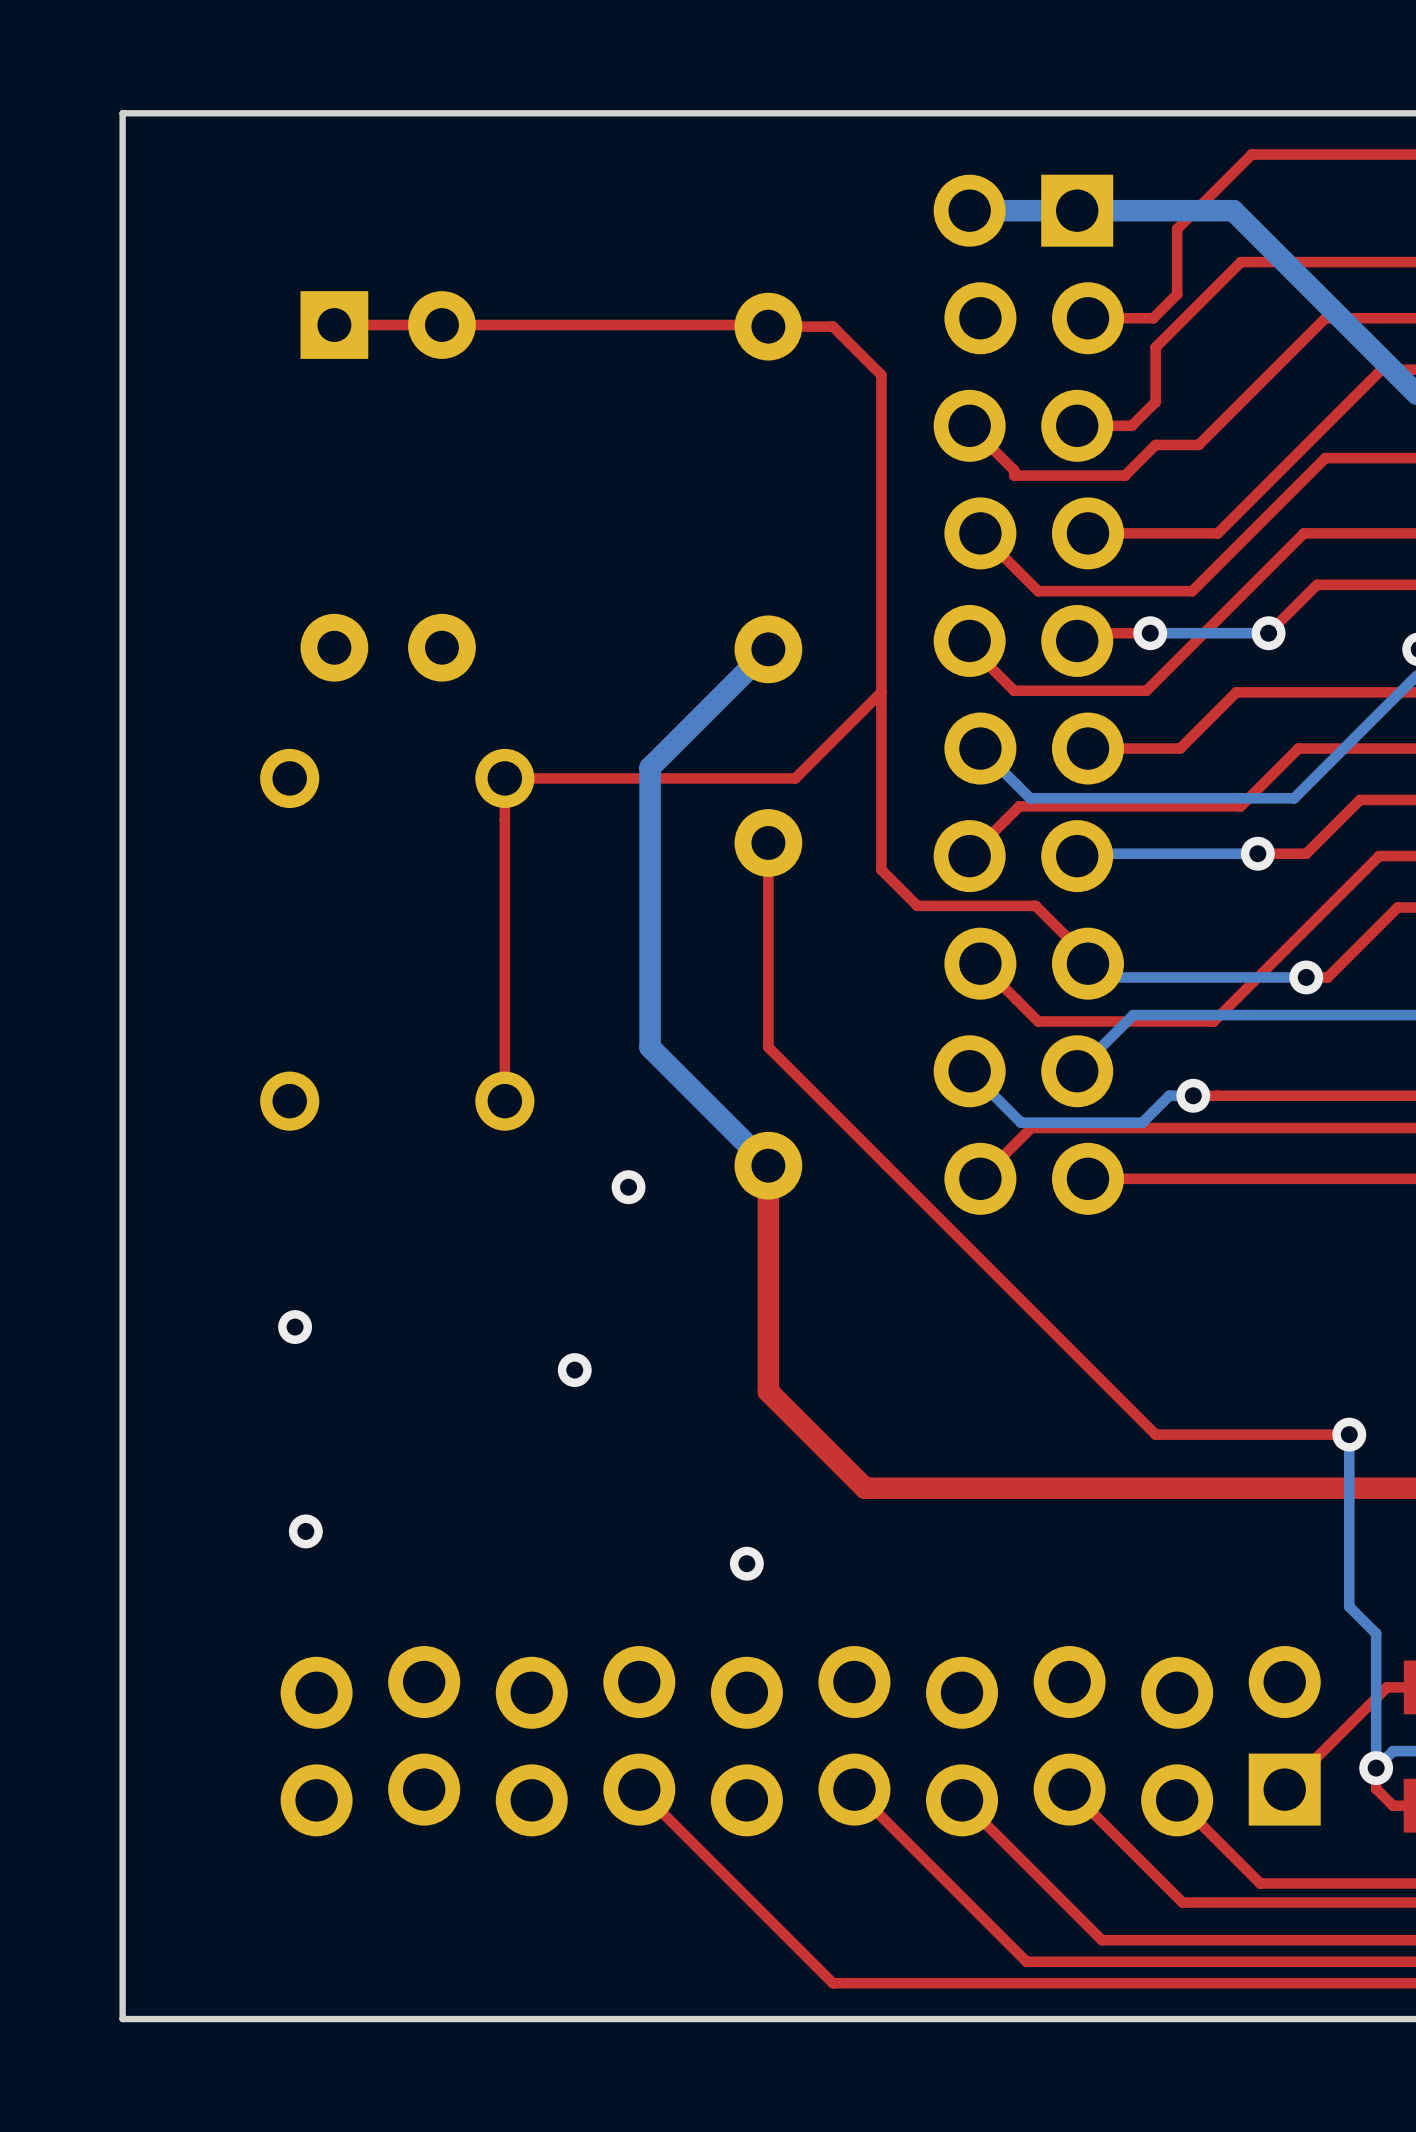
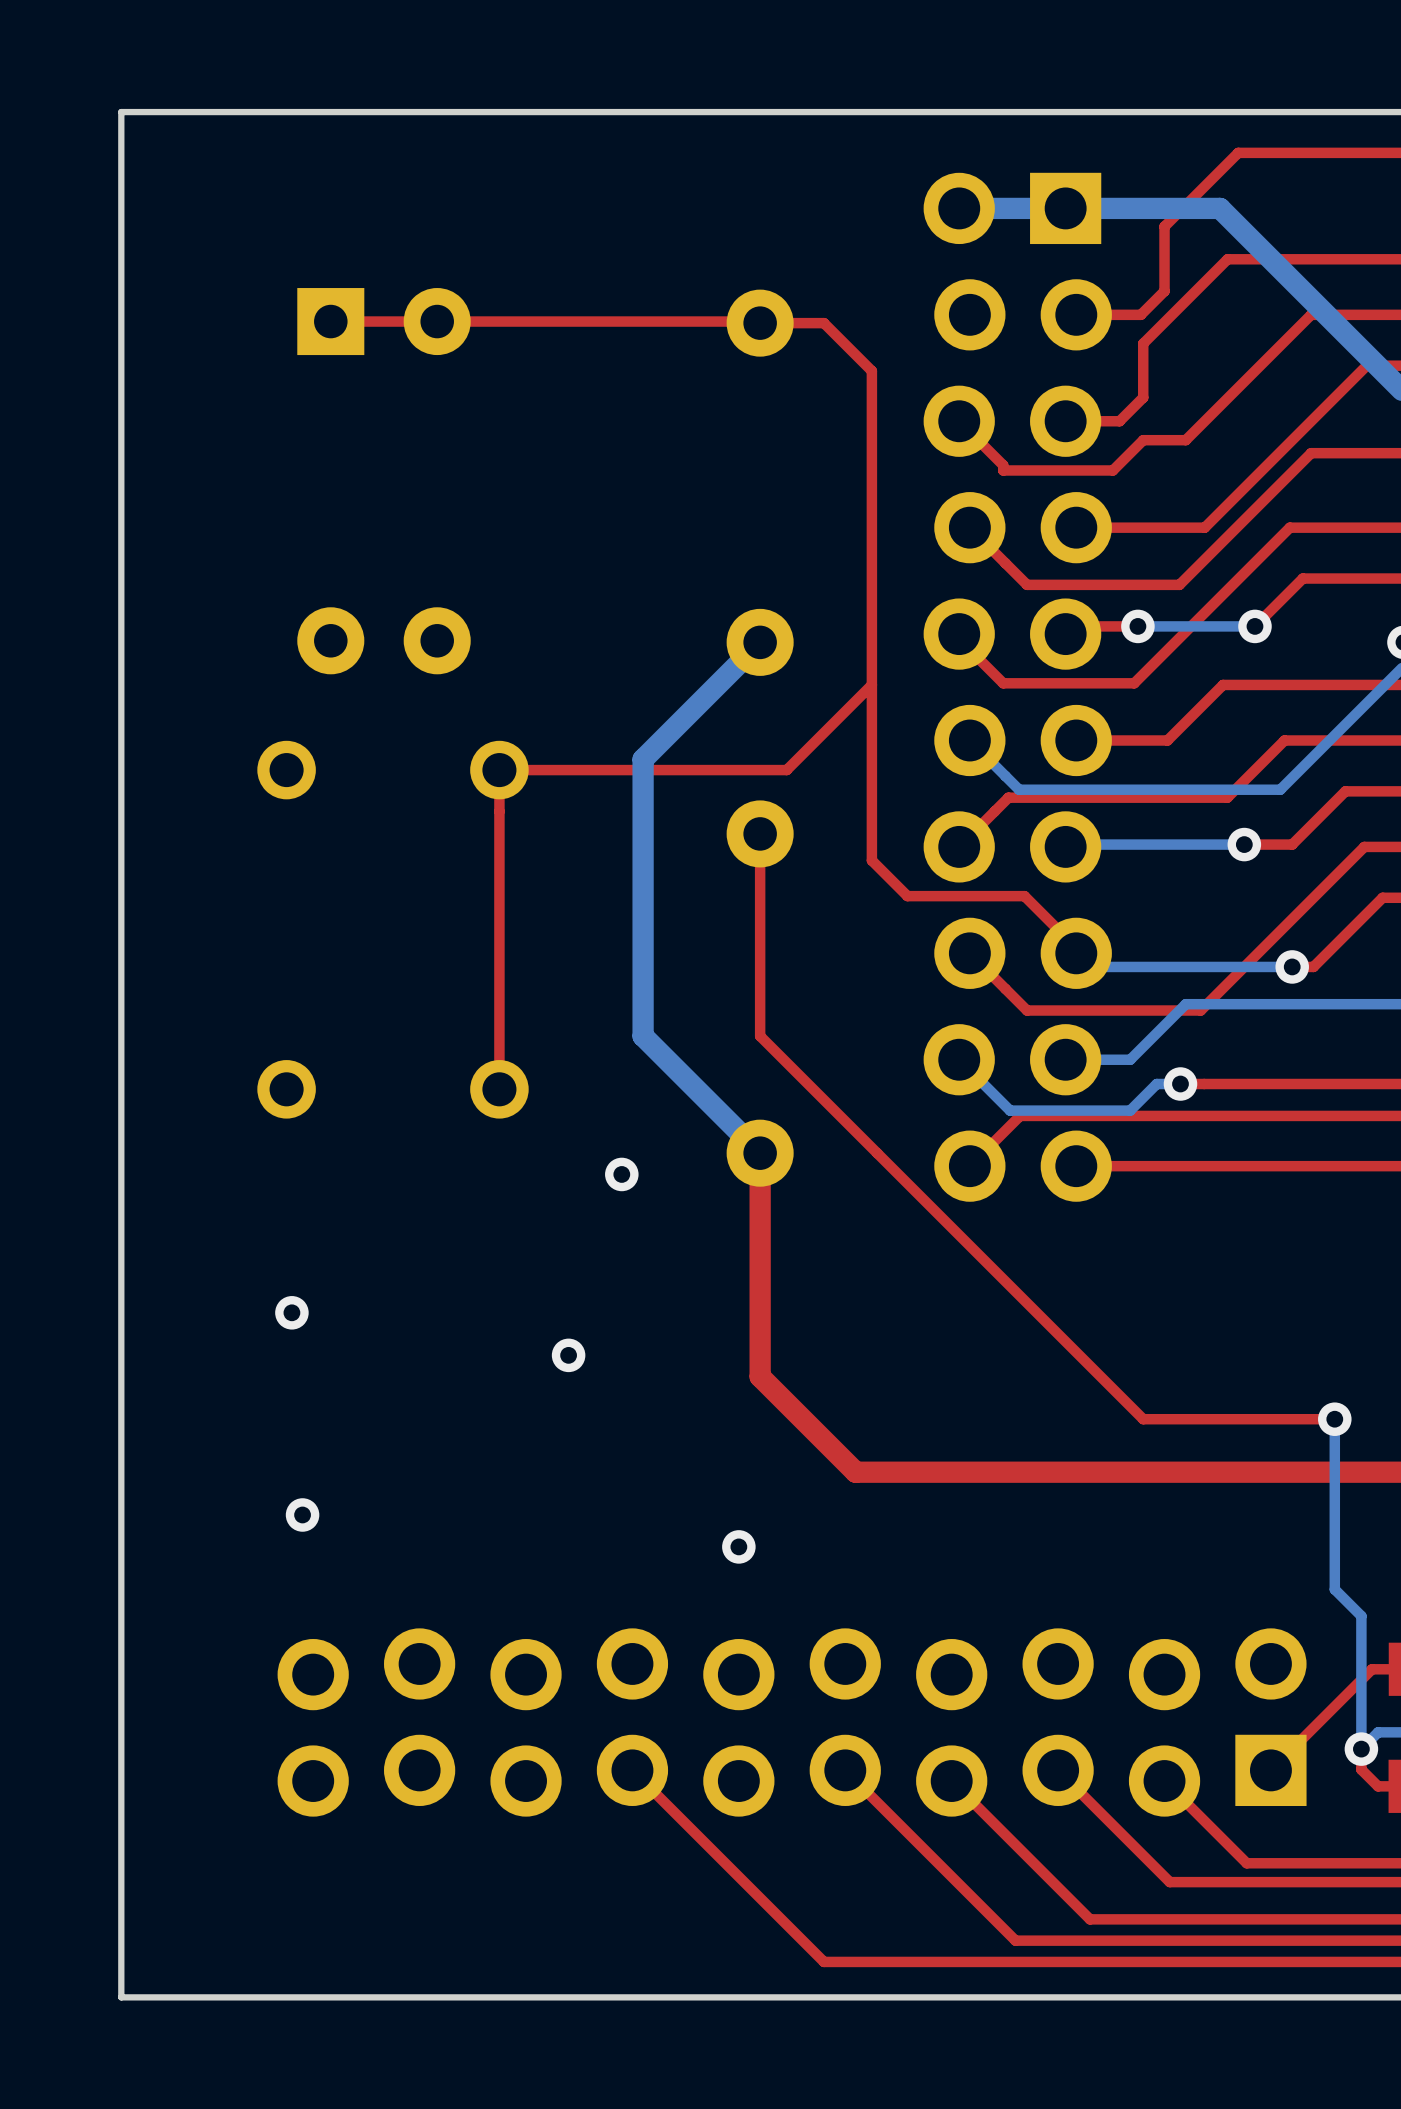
bottom track: (1198, 1015) (1133, 1015) (1077, 1071) -> (1185, 1004) (1130, 1059) (1065, 1059)

